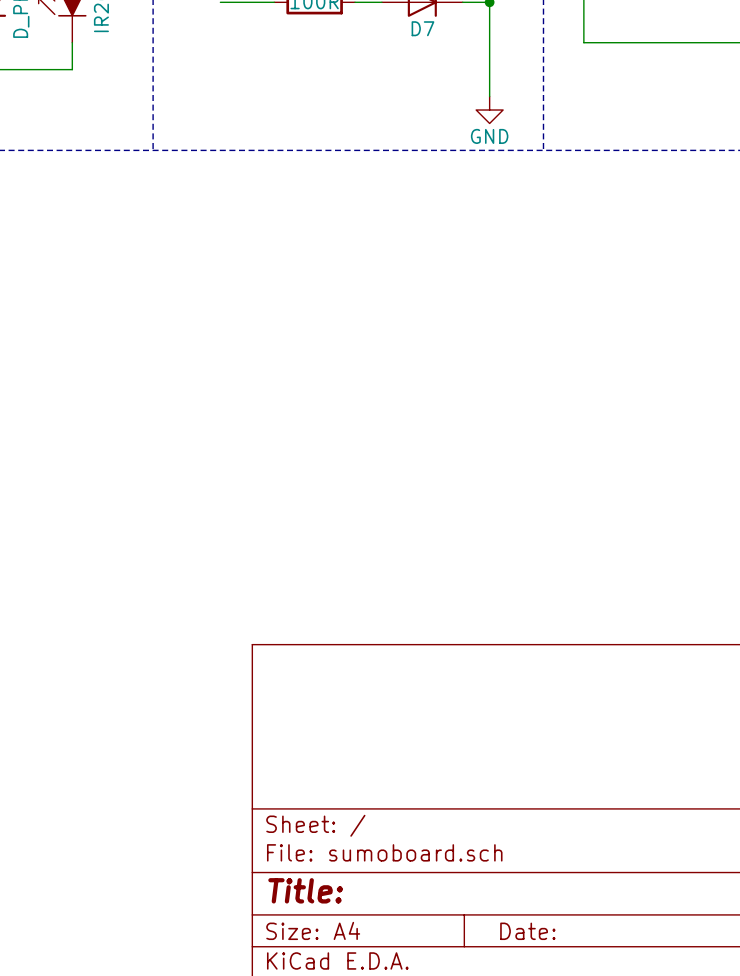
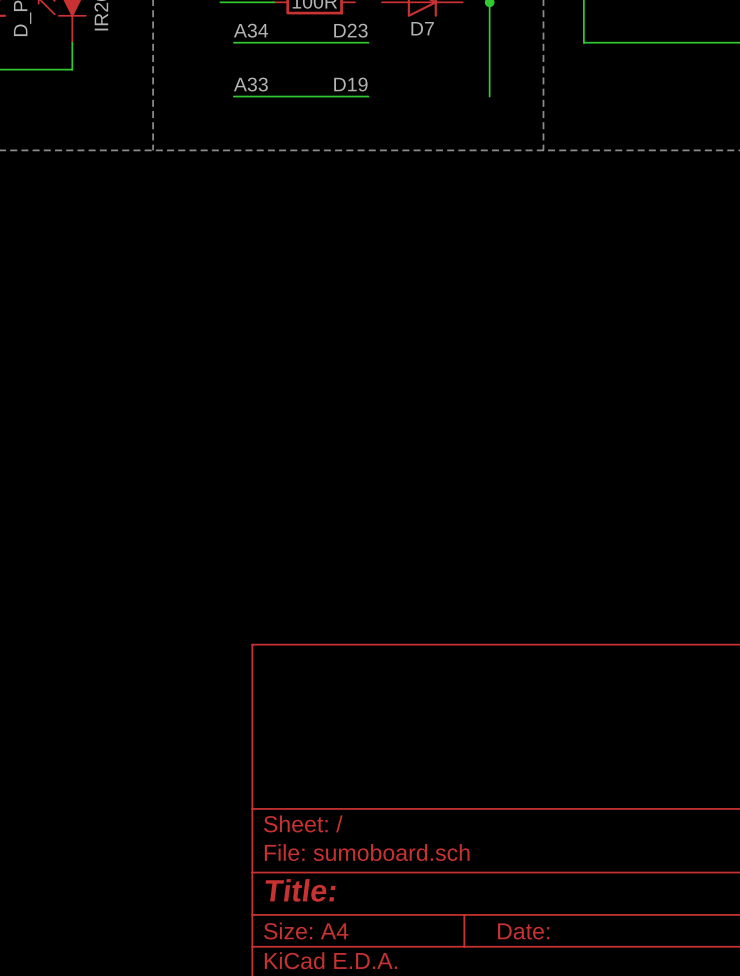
wire: (355, 2) (381, 2) -> none
wire: (462, 2) (489, 2) -> none
label: none -> A34 (251, 30)
label: none -> D23 (350, 30)
wire: none -> (233, 42) (368, 42)
label: none -> A33 (250, 84)
label: none -> D19 (350, 84)
wire: none -> (233, 96) (368, 96)
power symbol: GND (489, 110) -> none

